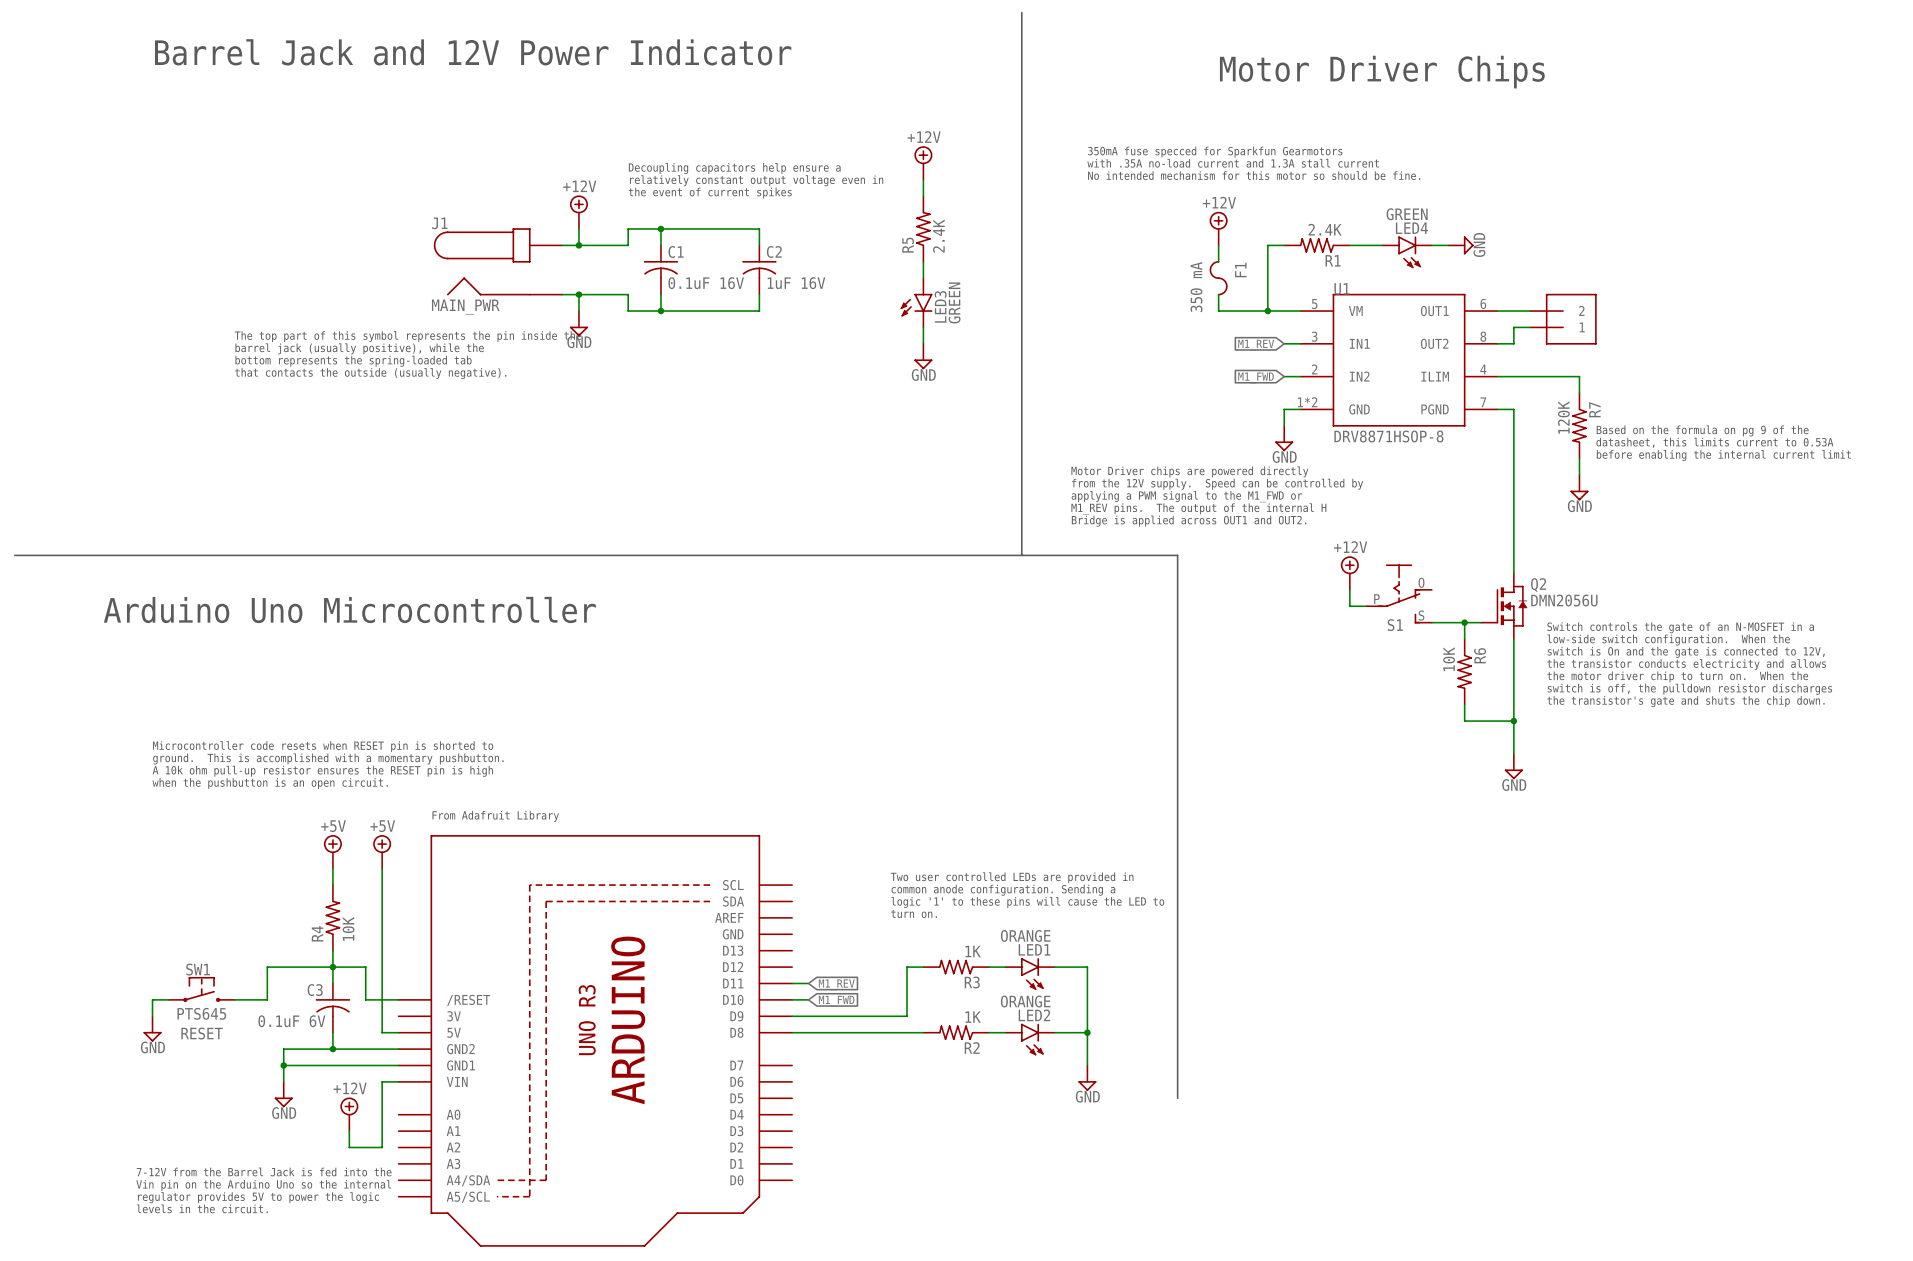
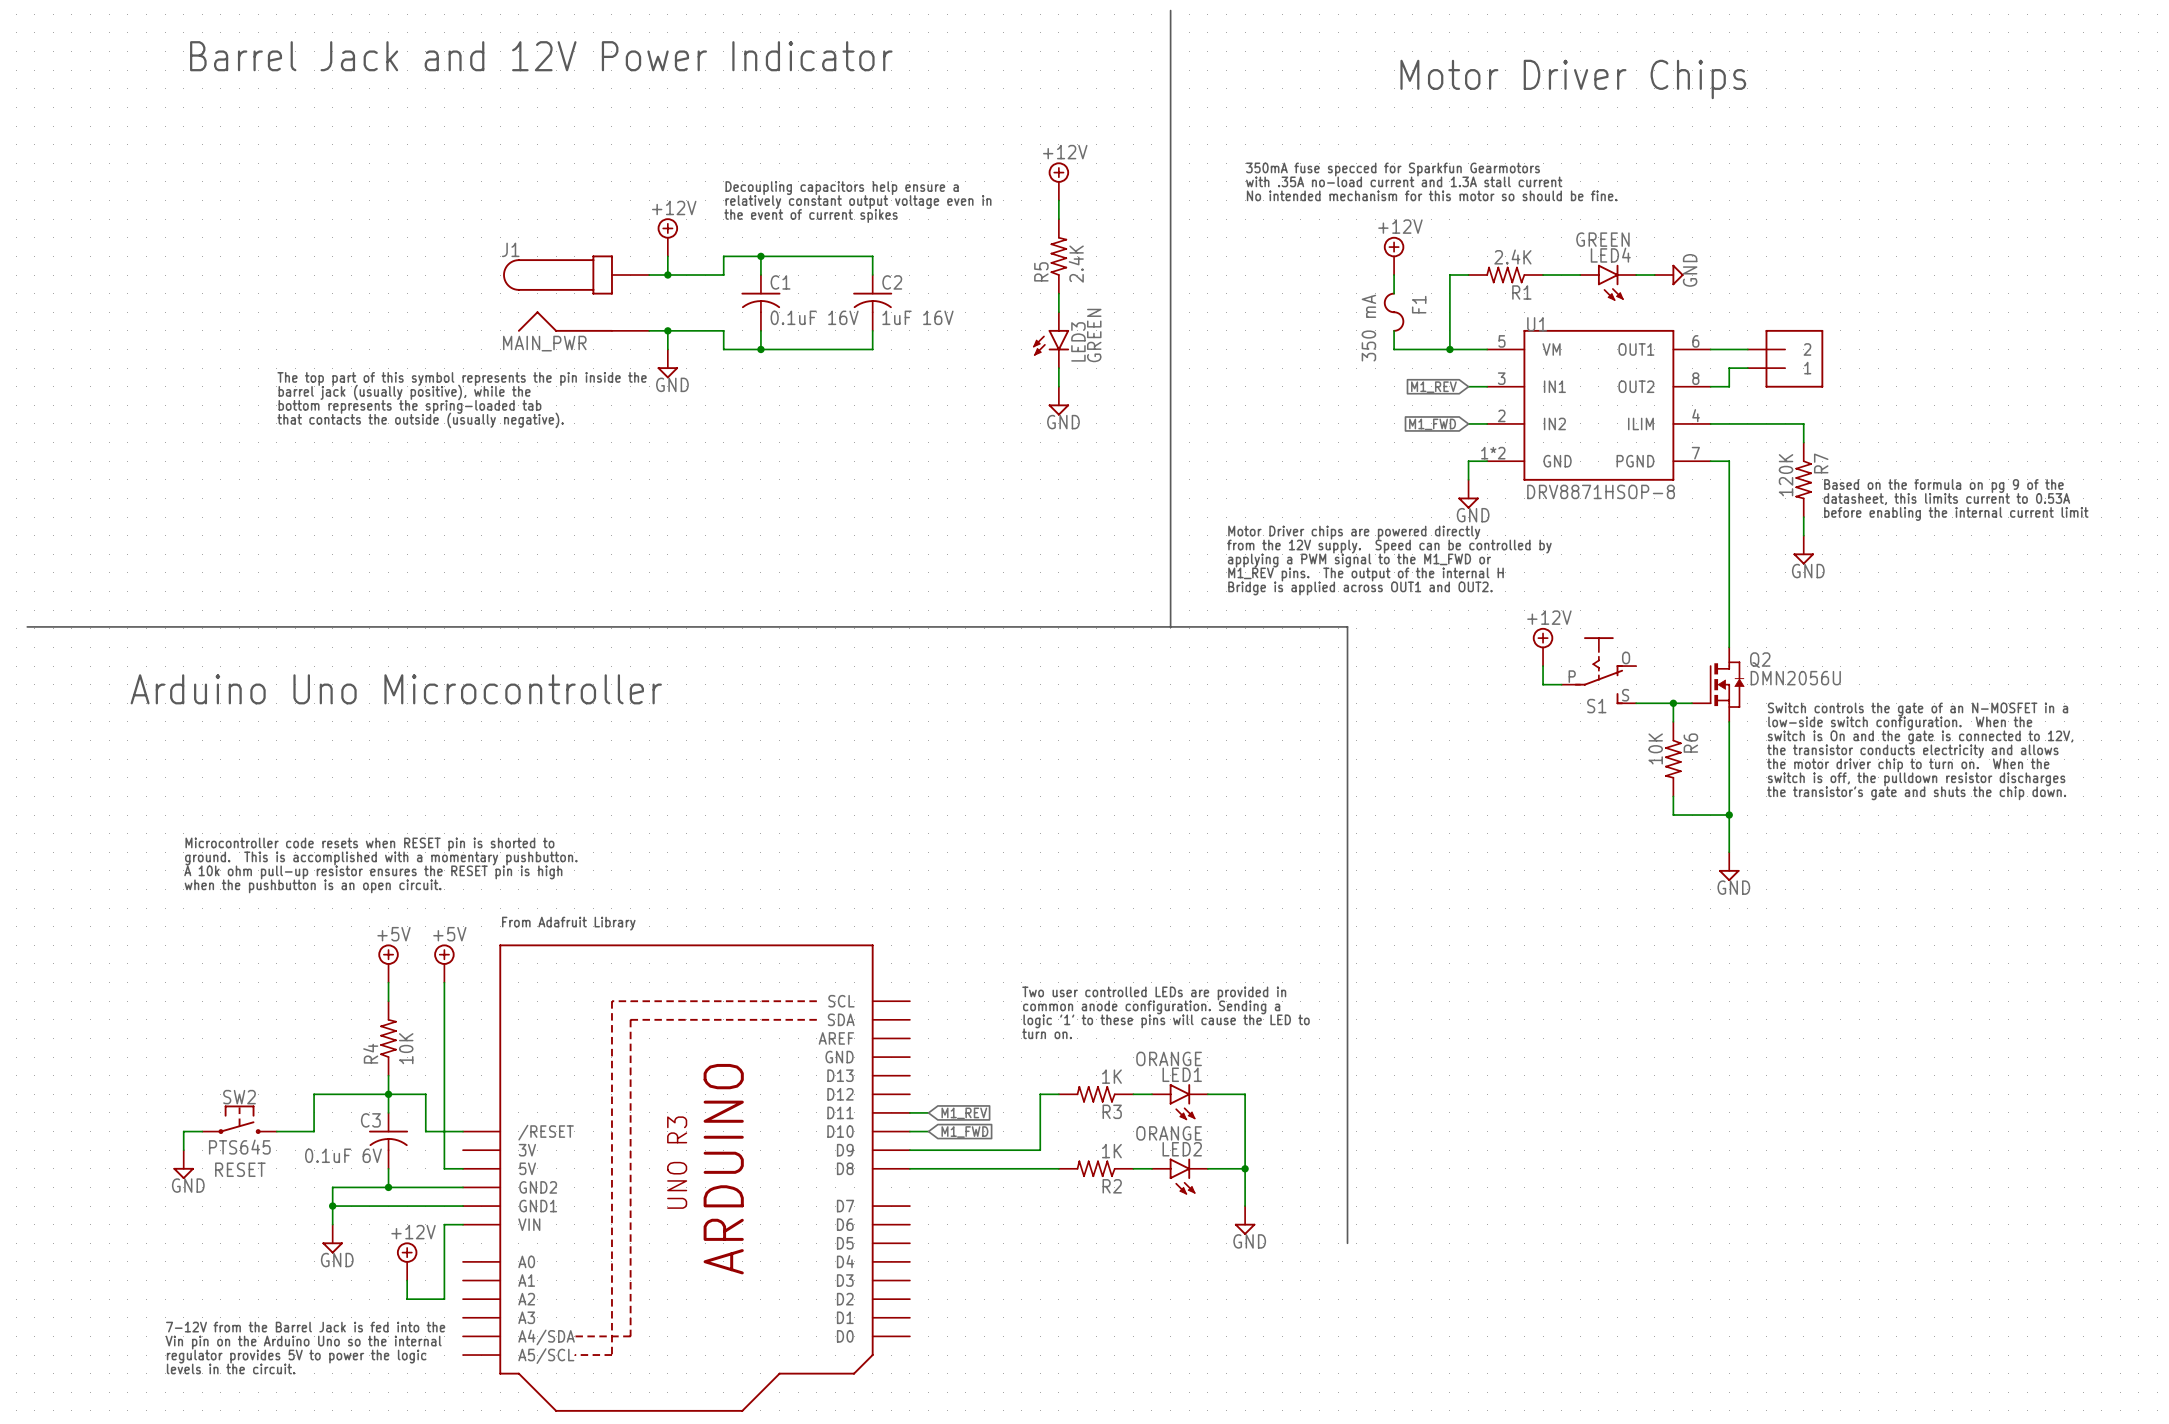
SW1 name: SW1 (198, 969) -> SW2 (239, 1097)

